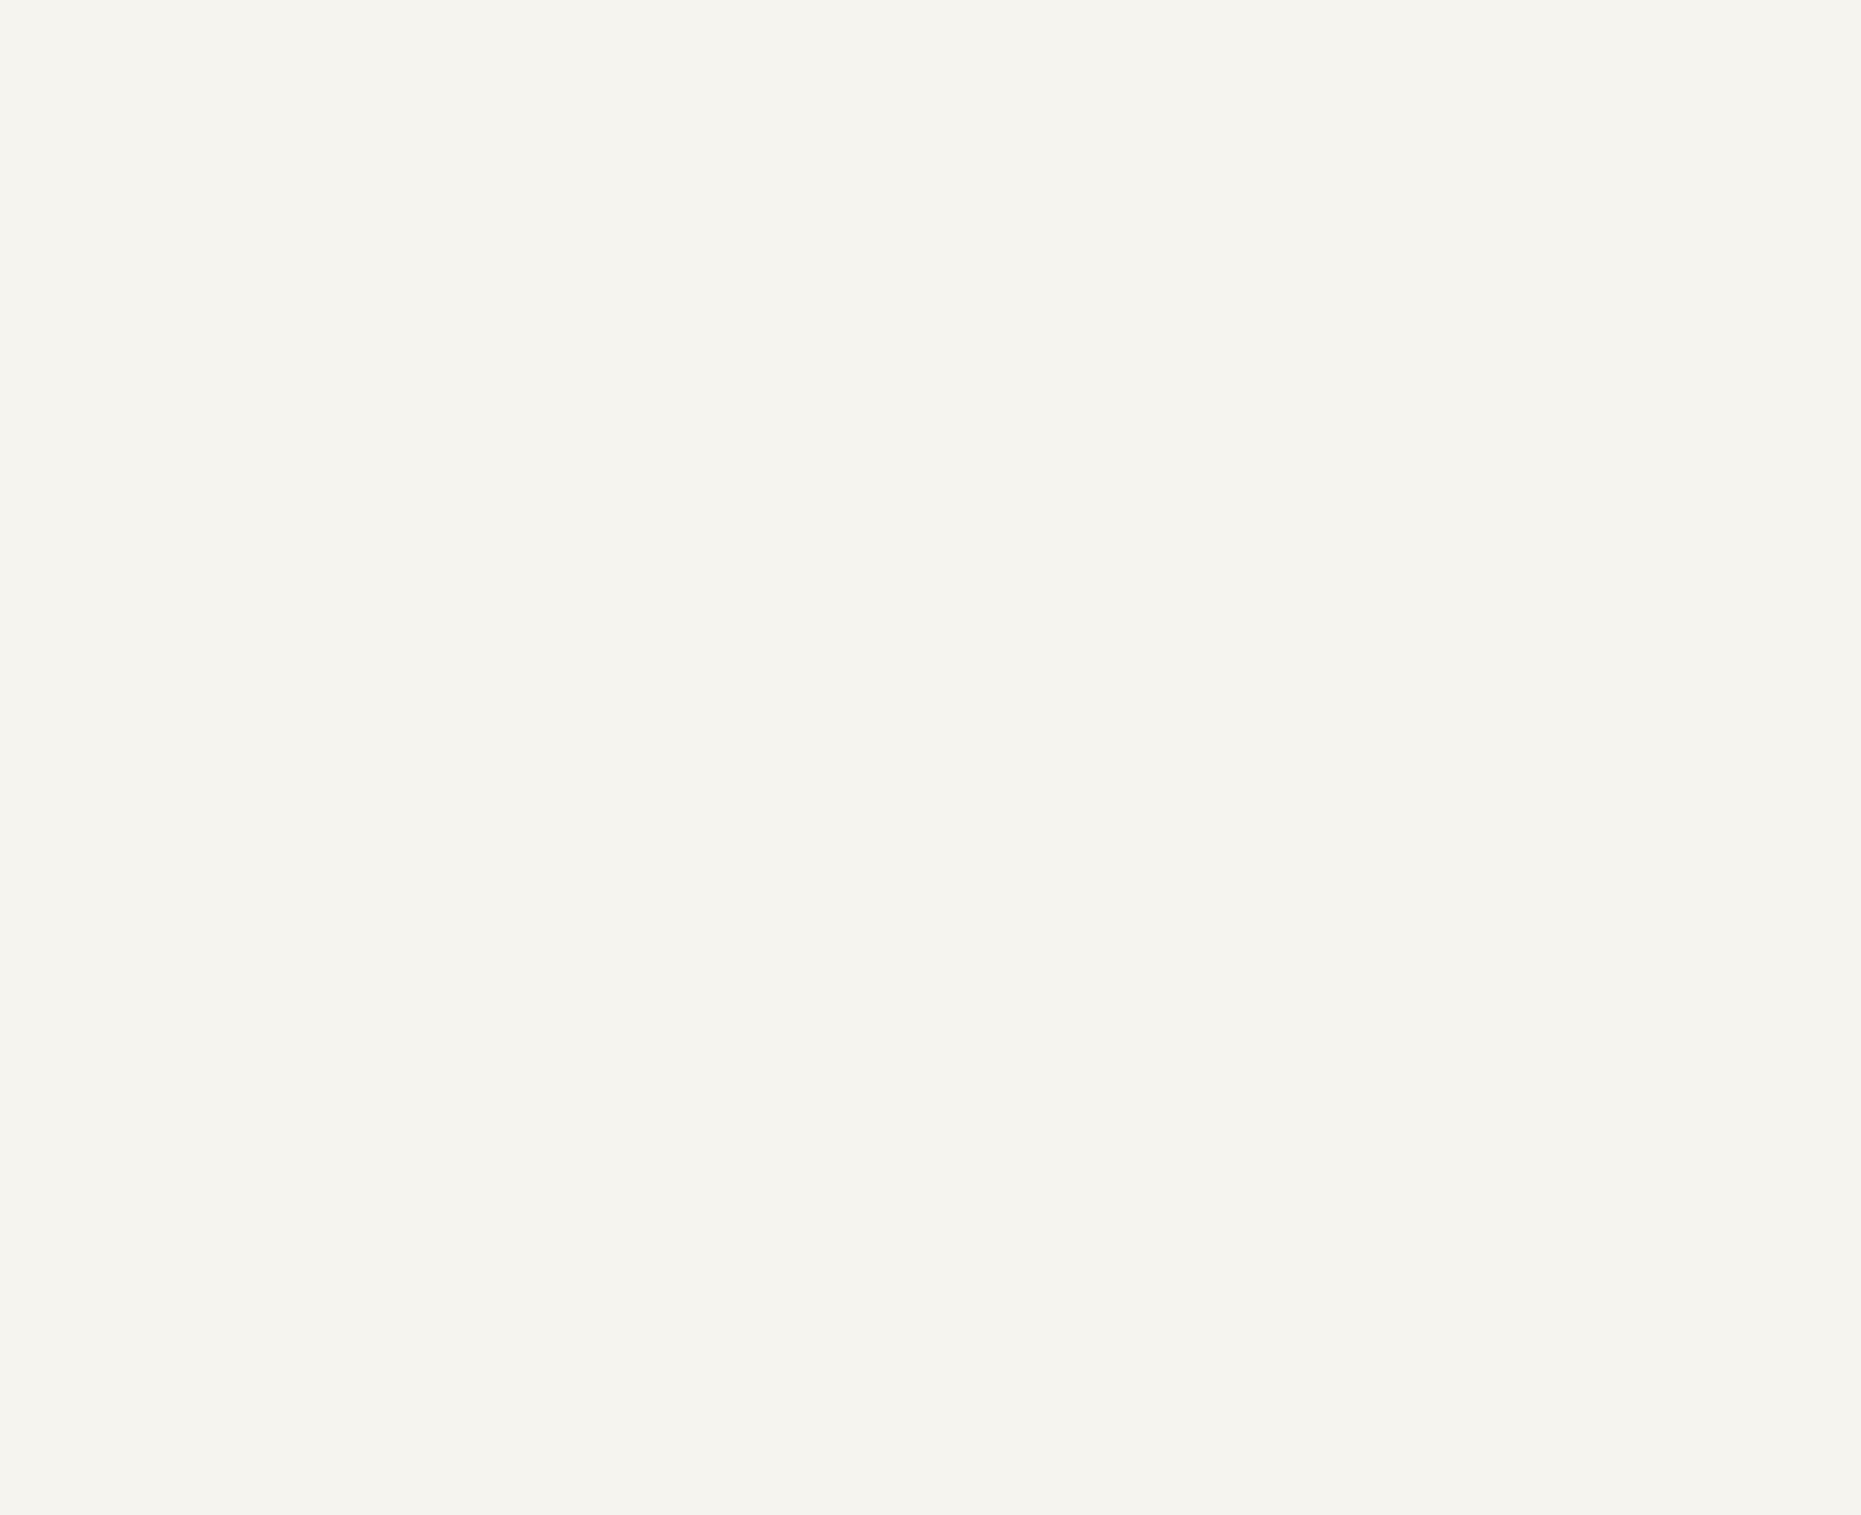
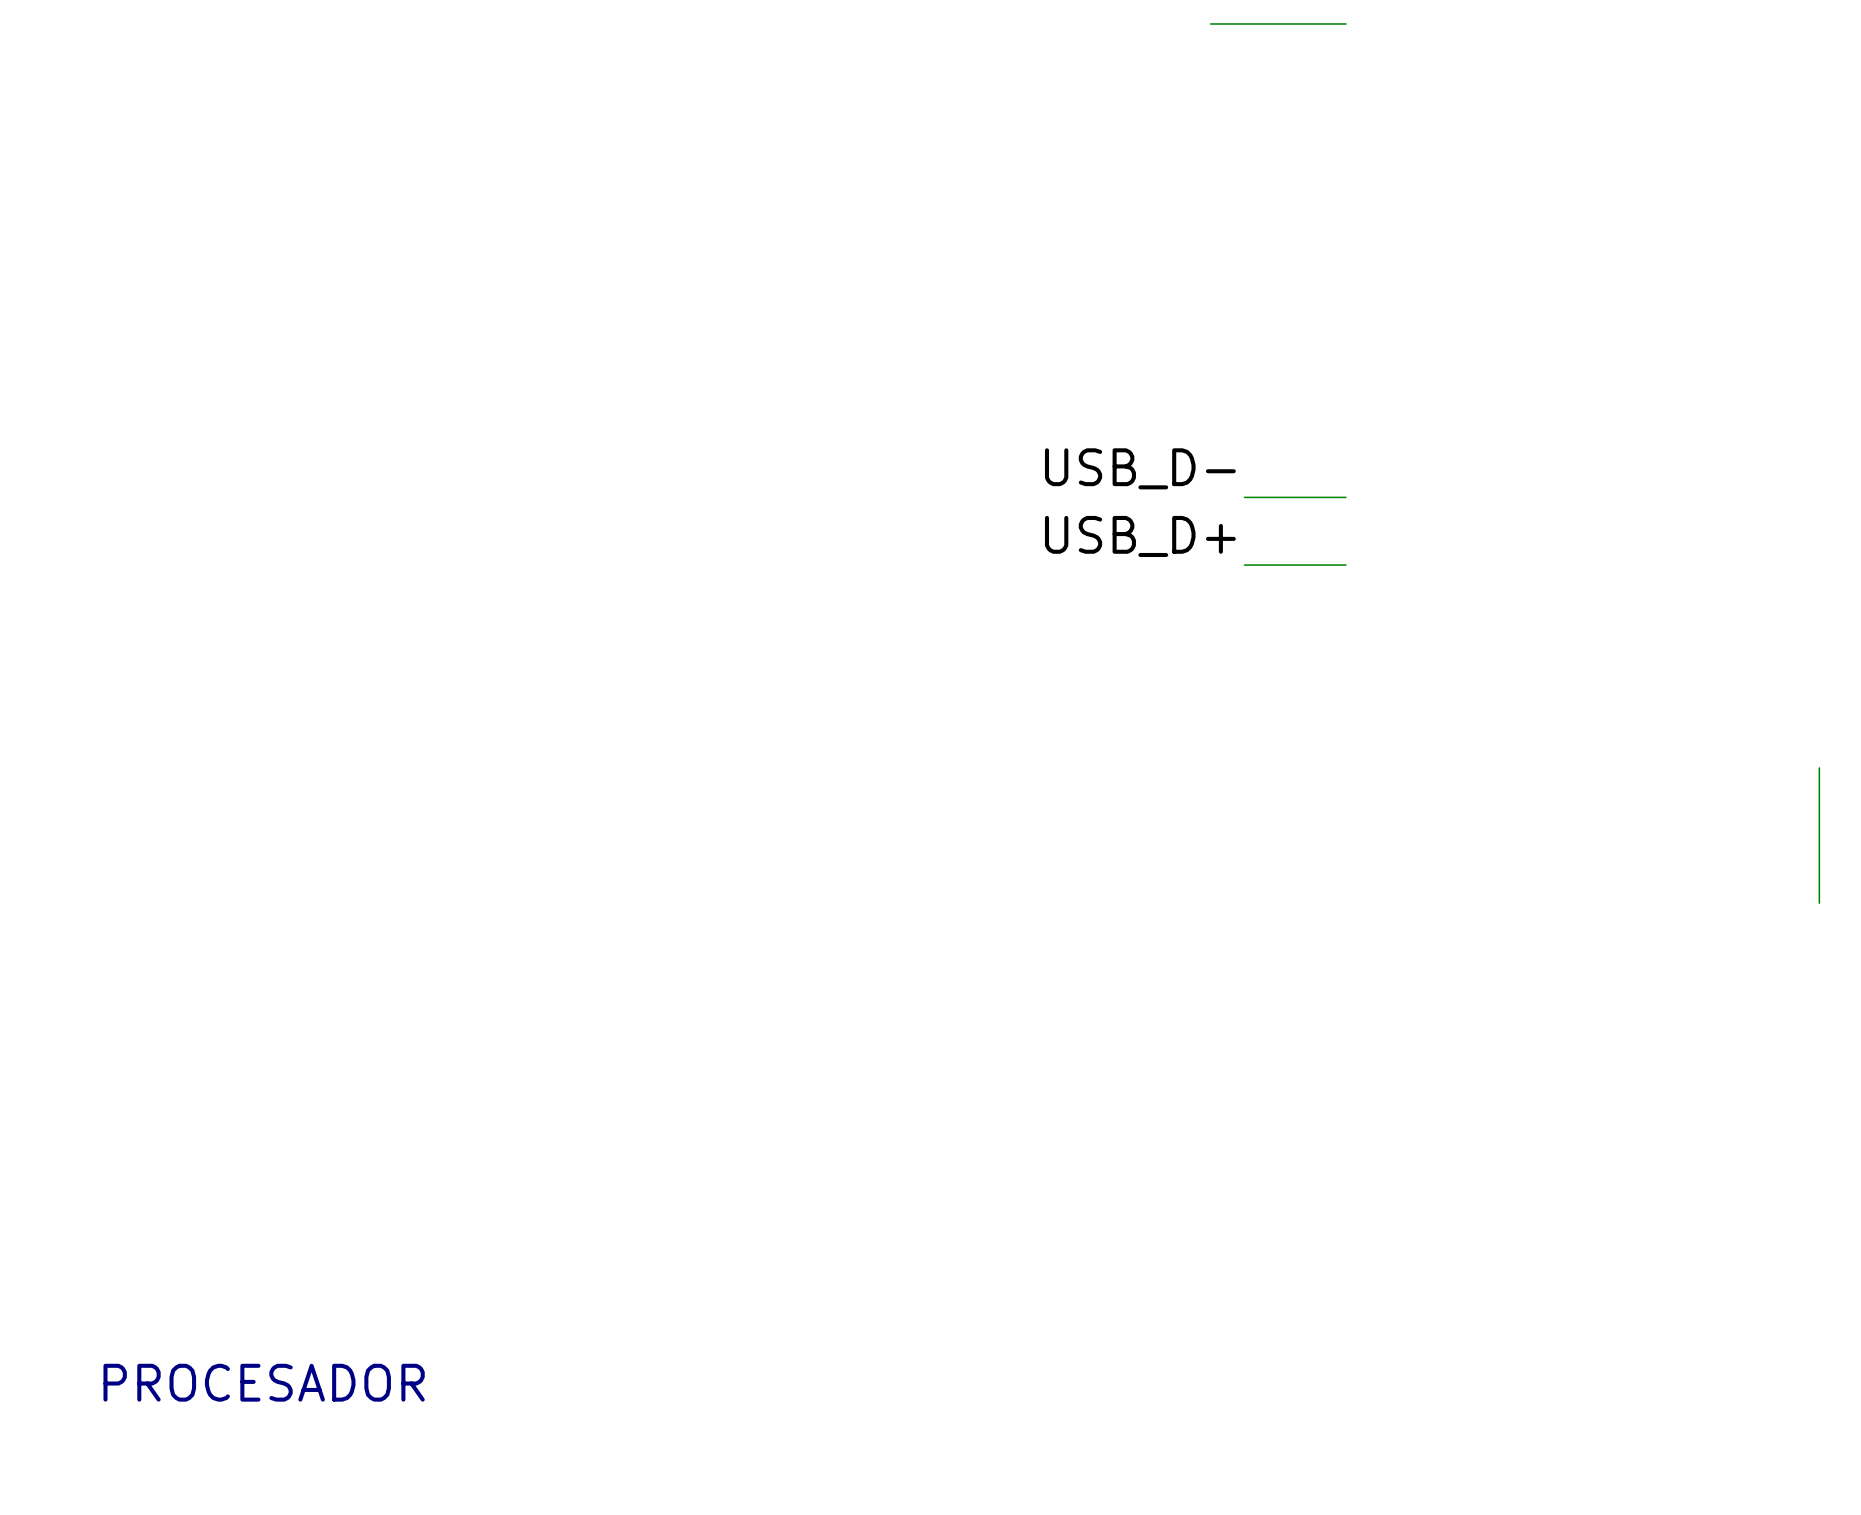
wire: none -> (1210, 23) (1345, 23)
label: none -> USB_D- (1140, 468)
wire: none -> (1244, 497) (1345, 497)
label: none -> USB_D+ (1140, 536)
wire: none -> (1244, 565) (1345, 565)
wire: none -> (1819, 767) (1819, 903)
text: none -> PROCESADOR (264, 1382)

